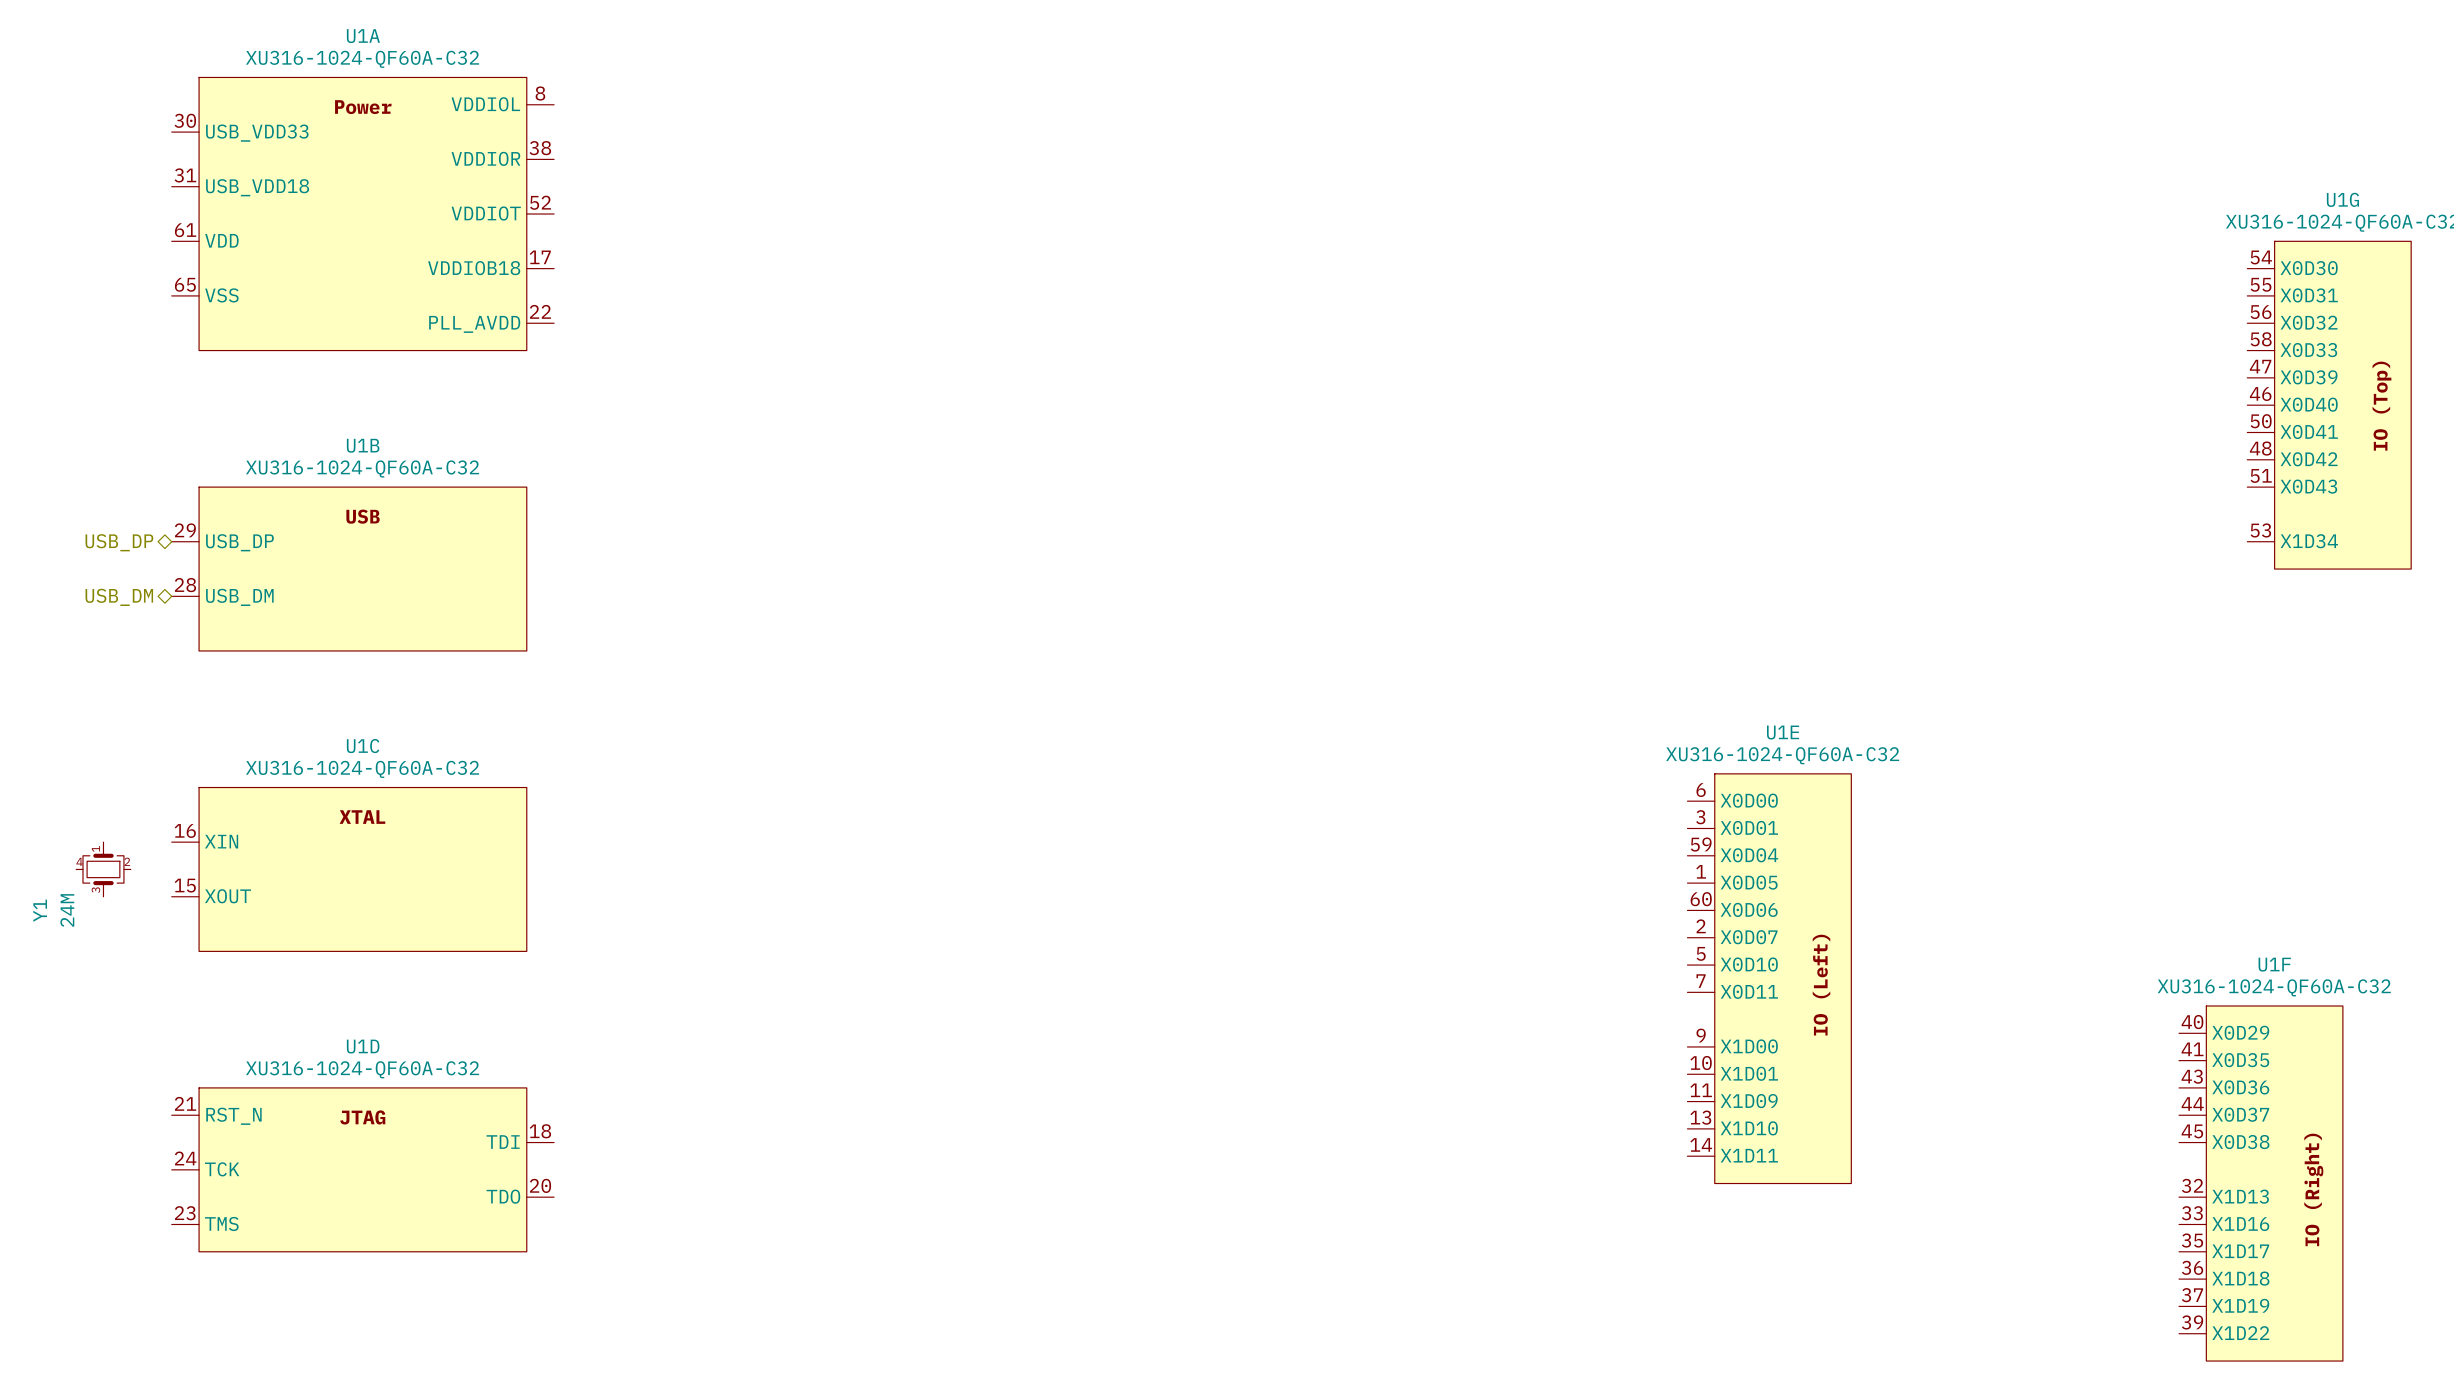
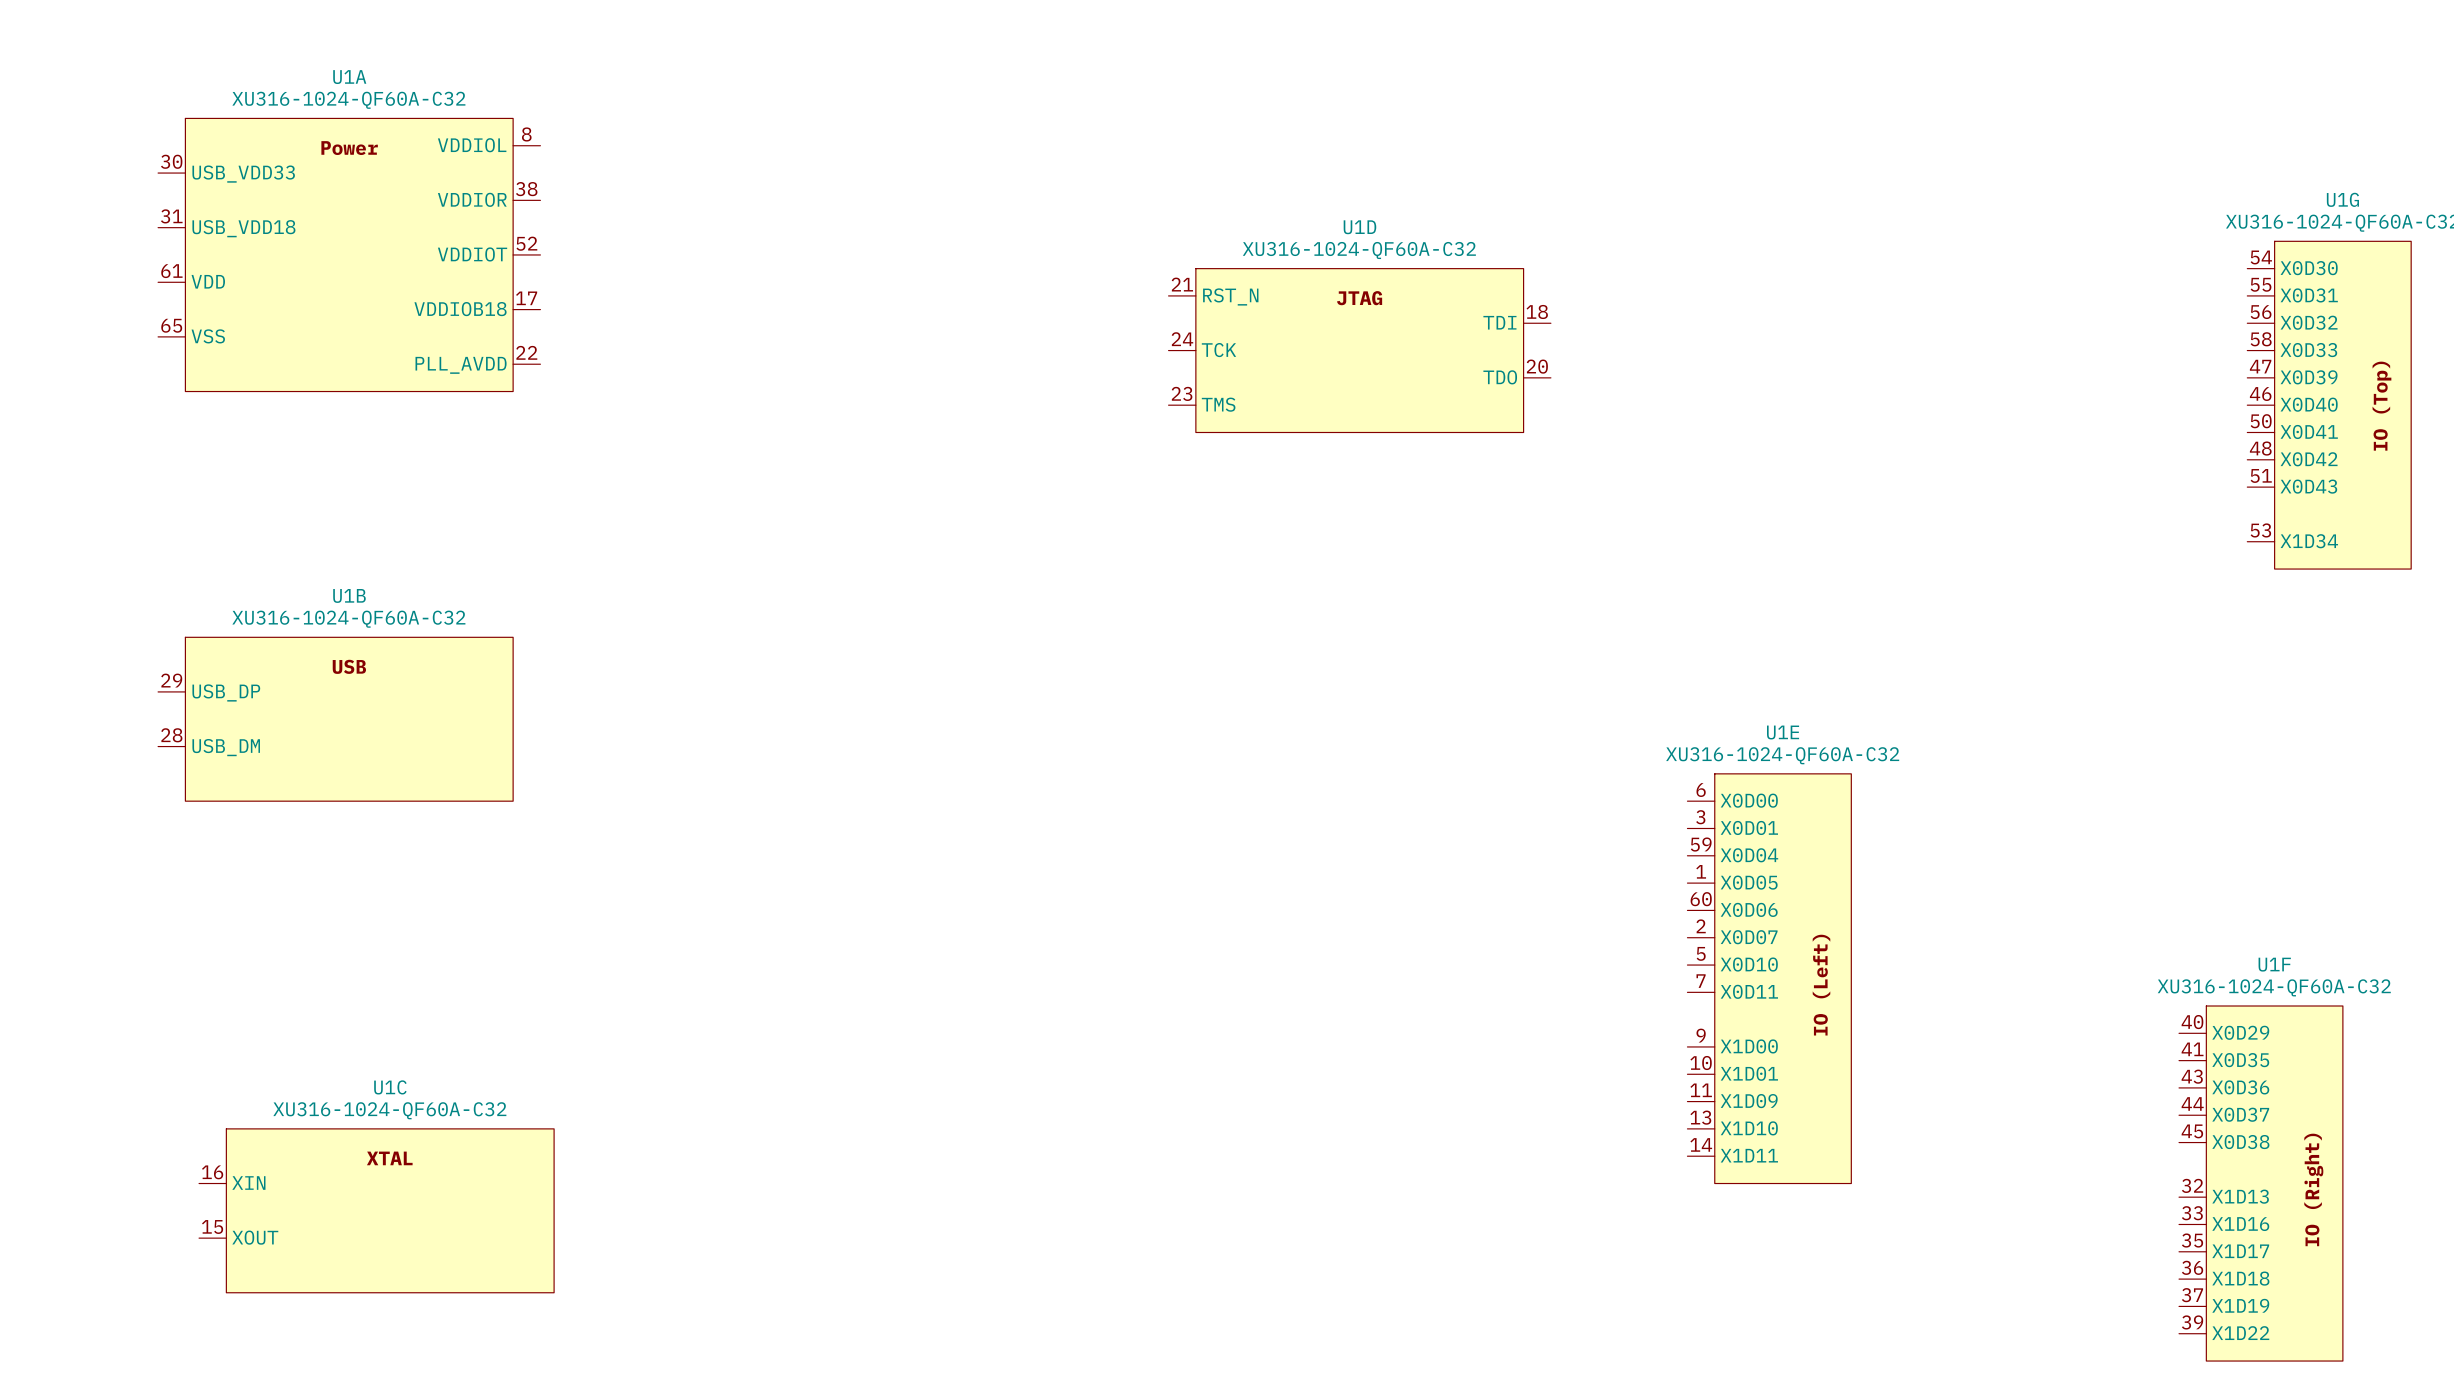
U1A position: (362, 214) -> (349, 254)
hierarchical label: USB_DP (119, 542) -> none
U1B position: (349, 569) -> (335, 719)
hierarchical label: USB_DM (119, 597) -> none
Y1: 24M (103, 869) -> none
U1C position: (349, 869) -> (376, 1210)
U1D position: (362, 1169) -> (1359, 350)

